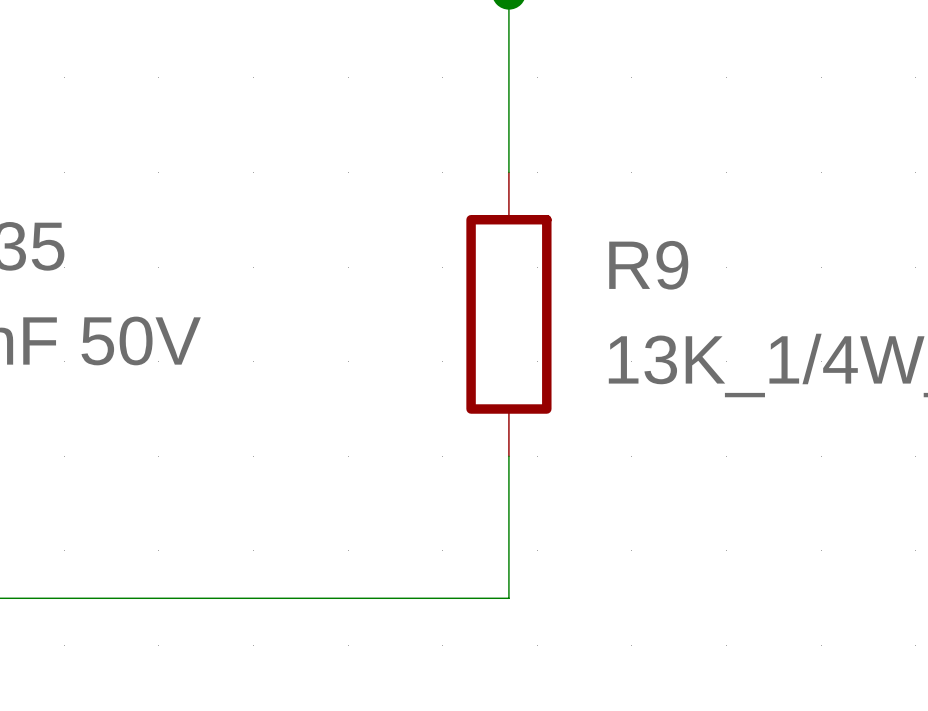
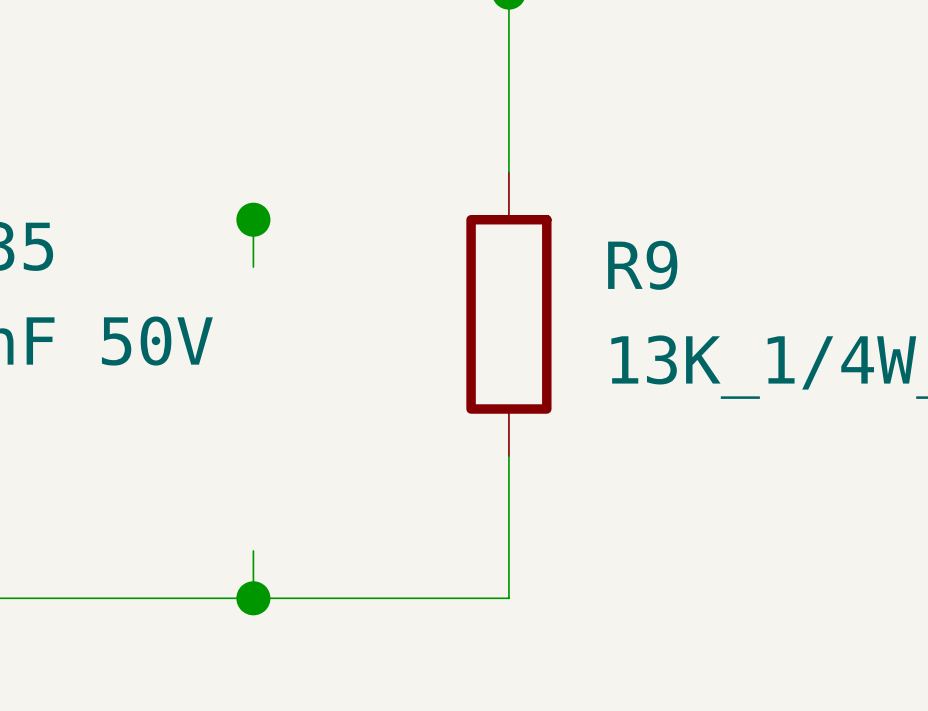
wire: none -> (253, 219) (253, 267)
junction: none -> (253, 219)
wire: none -> (253, 550) (253, 598)
junction: none -> (253, 598)

